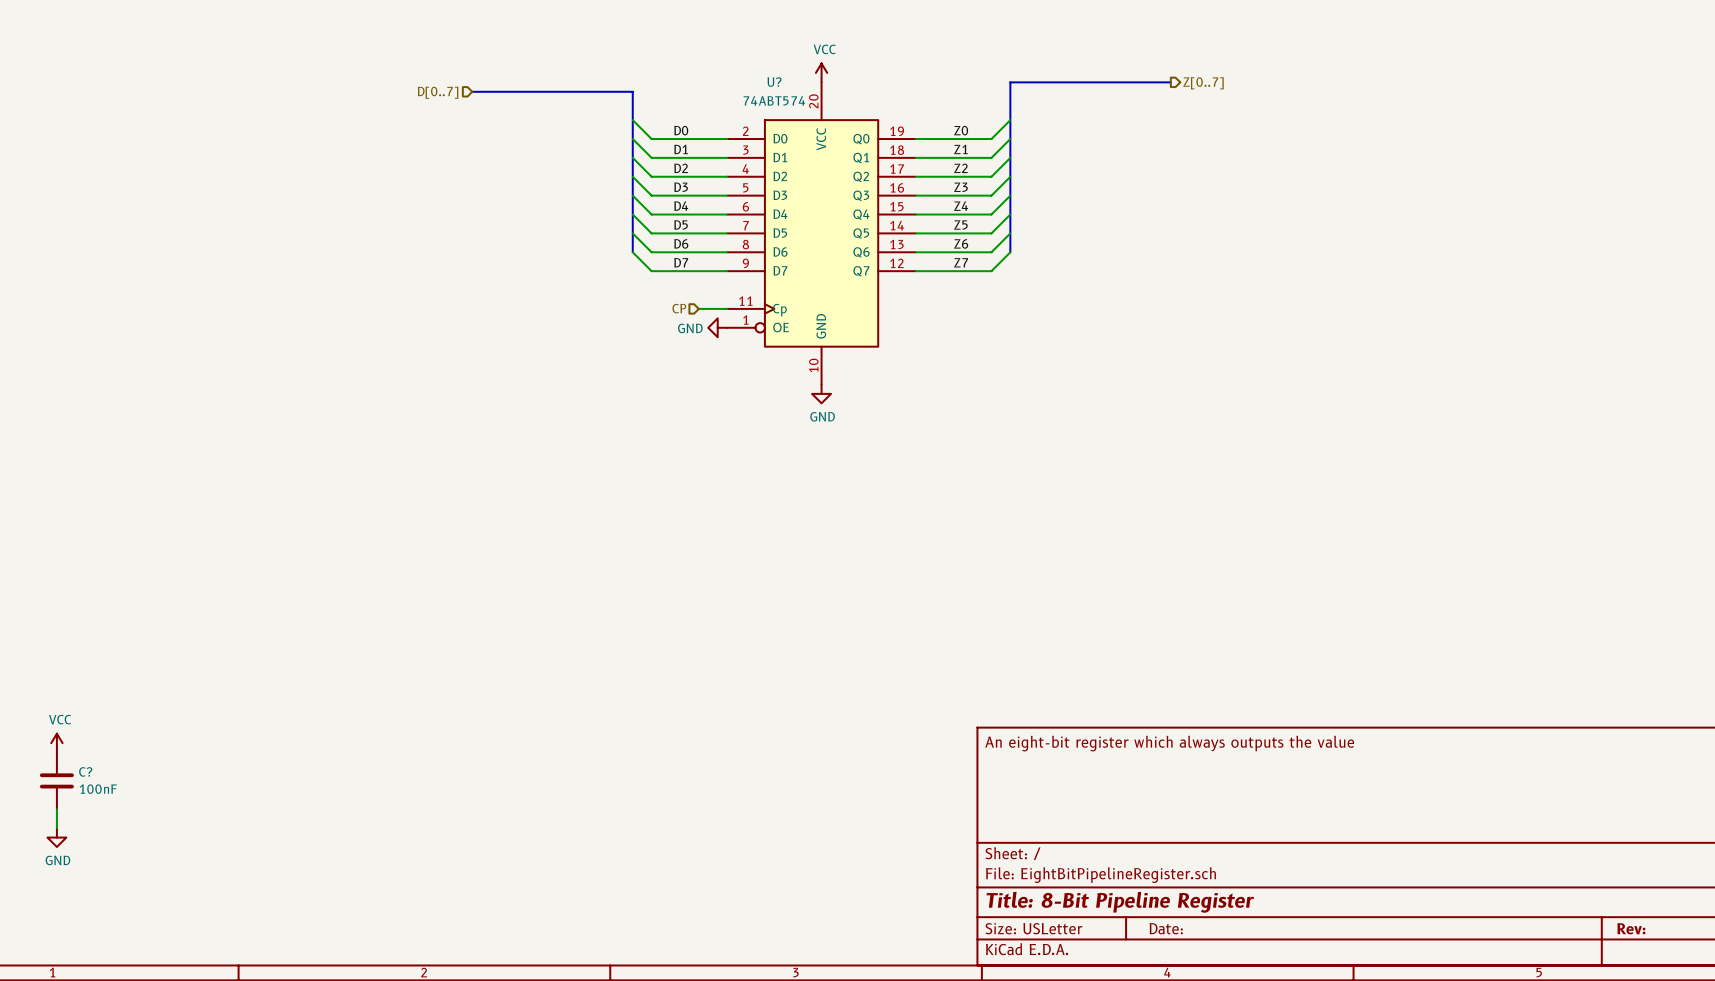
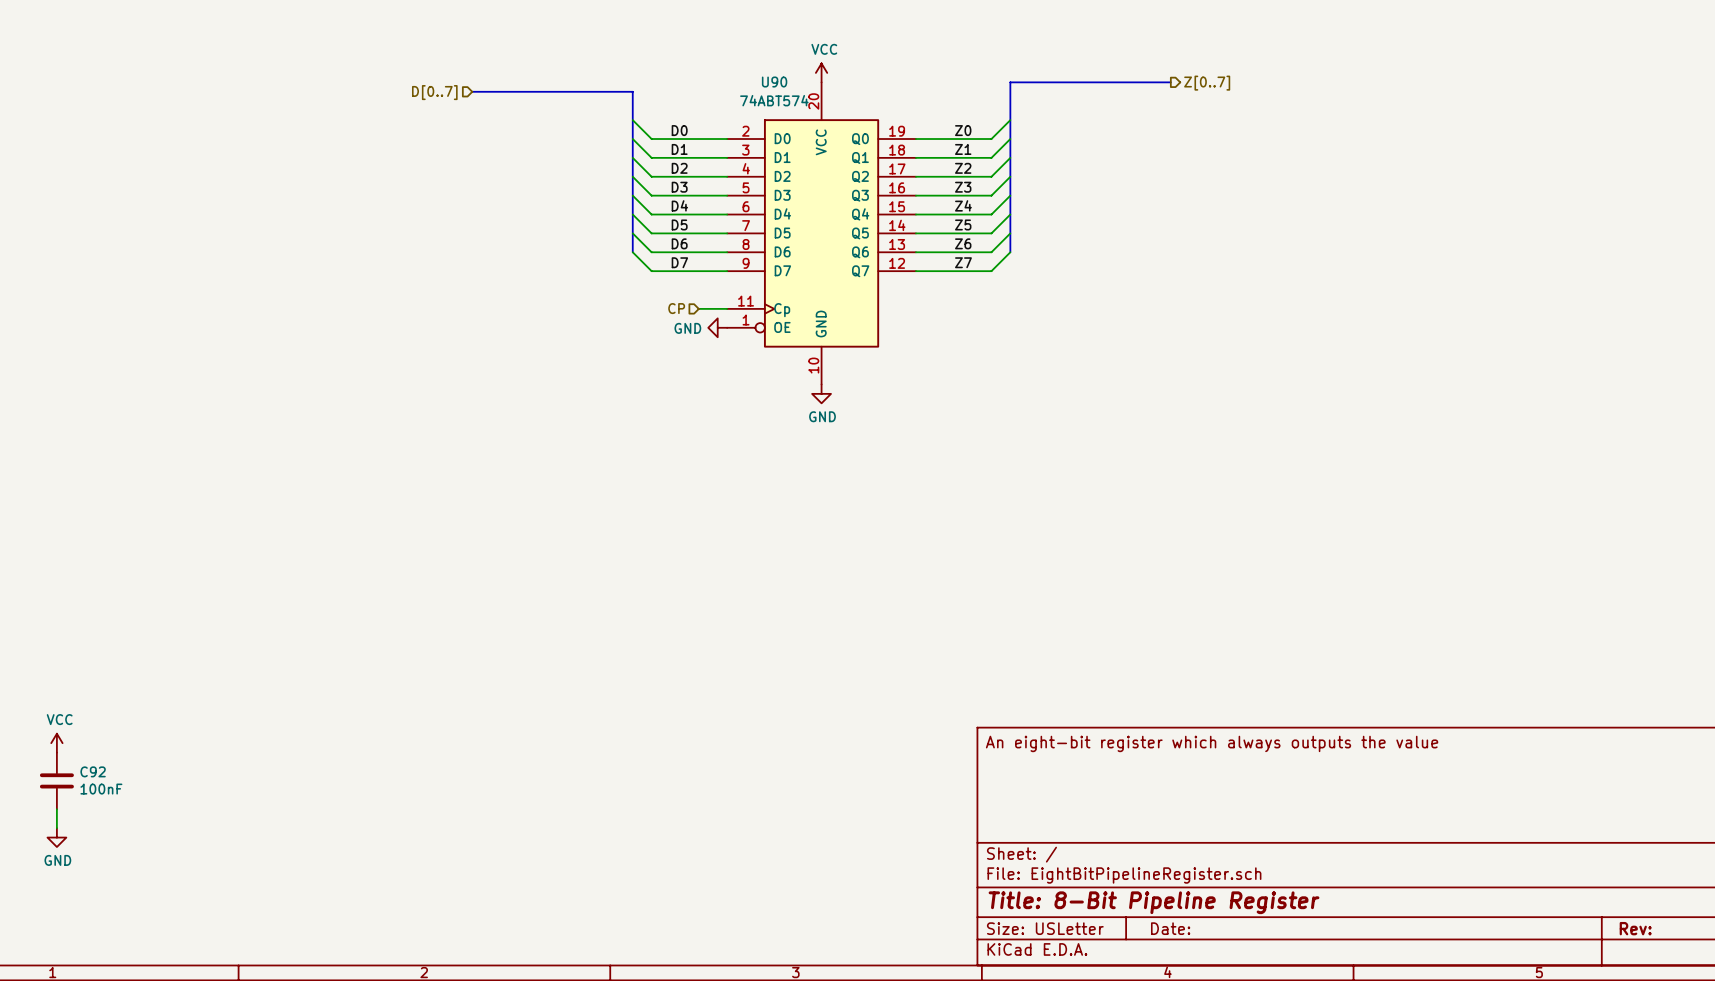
U? name: U? (774, 82) -> U90 (774, 82)
C? name: C? (85, 771) -> C92 (93, 771)

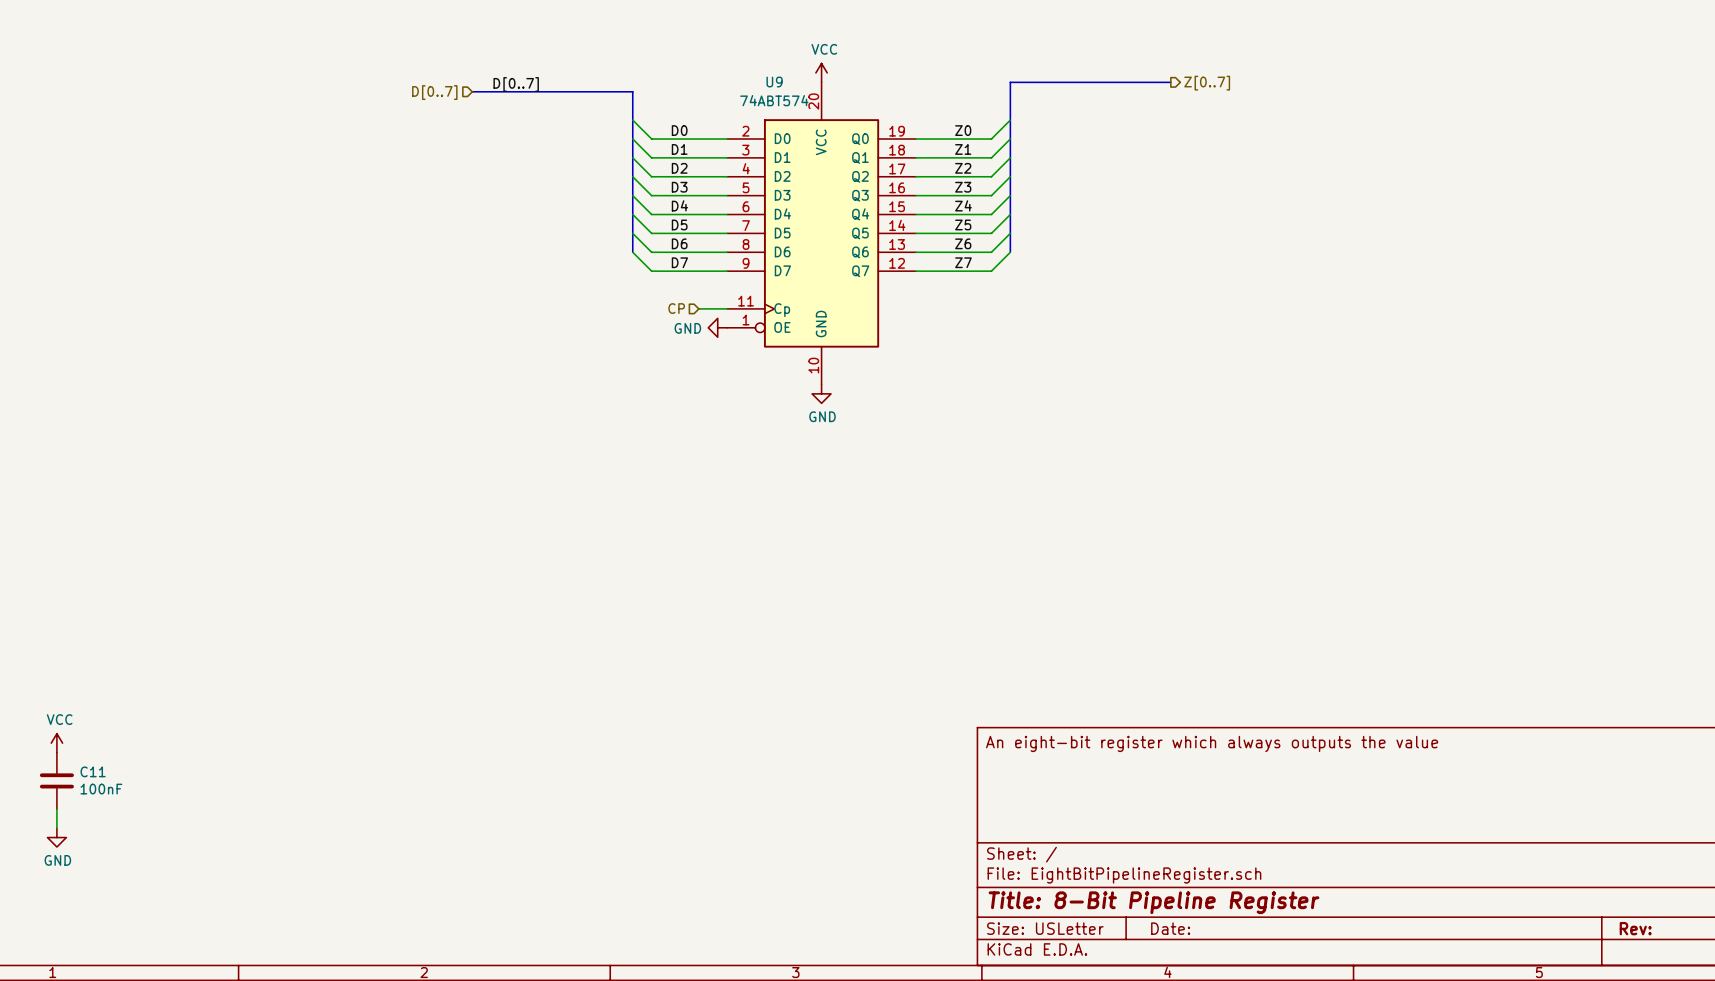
U90 name: U90 (774, 82) -> U9 (774, 82)
label: none -> D[0..7] (516, 84)
C92 name: C92 (93, 771) -> C11 (93, 771)

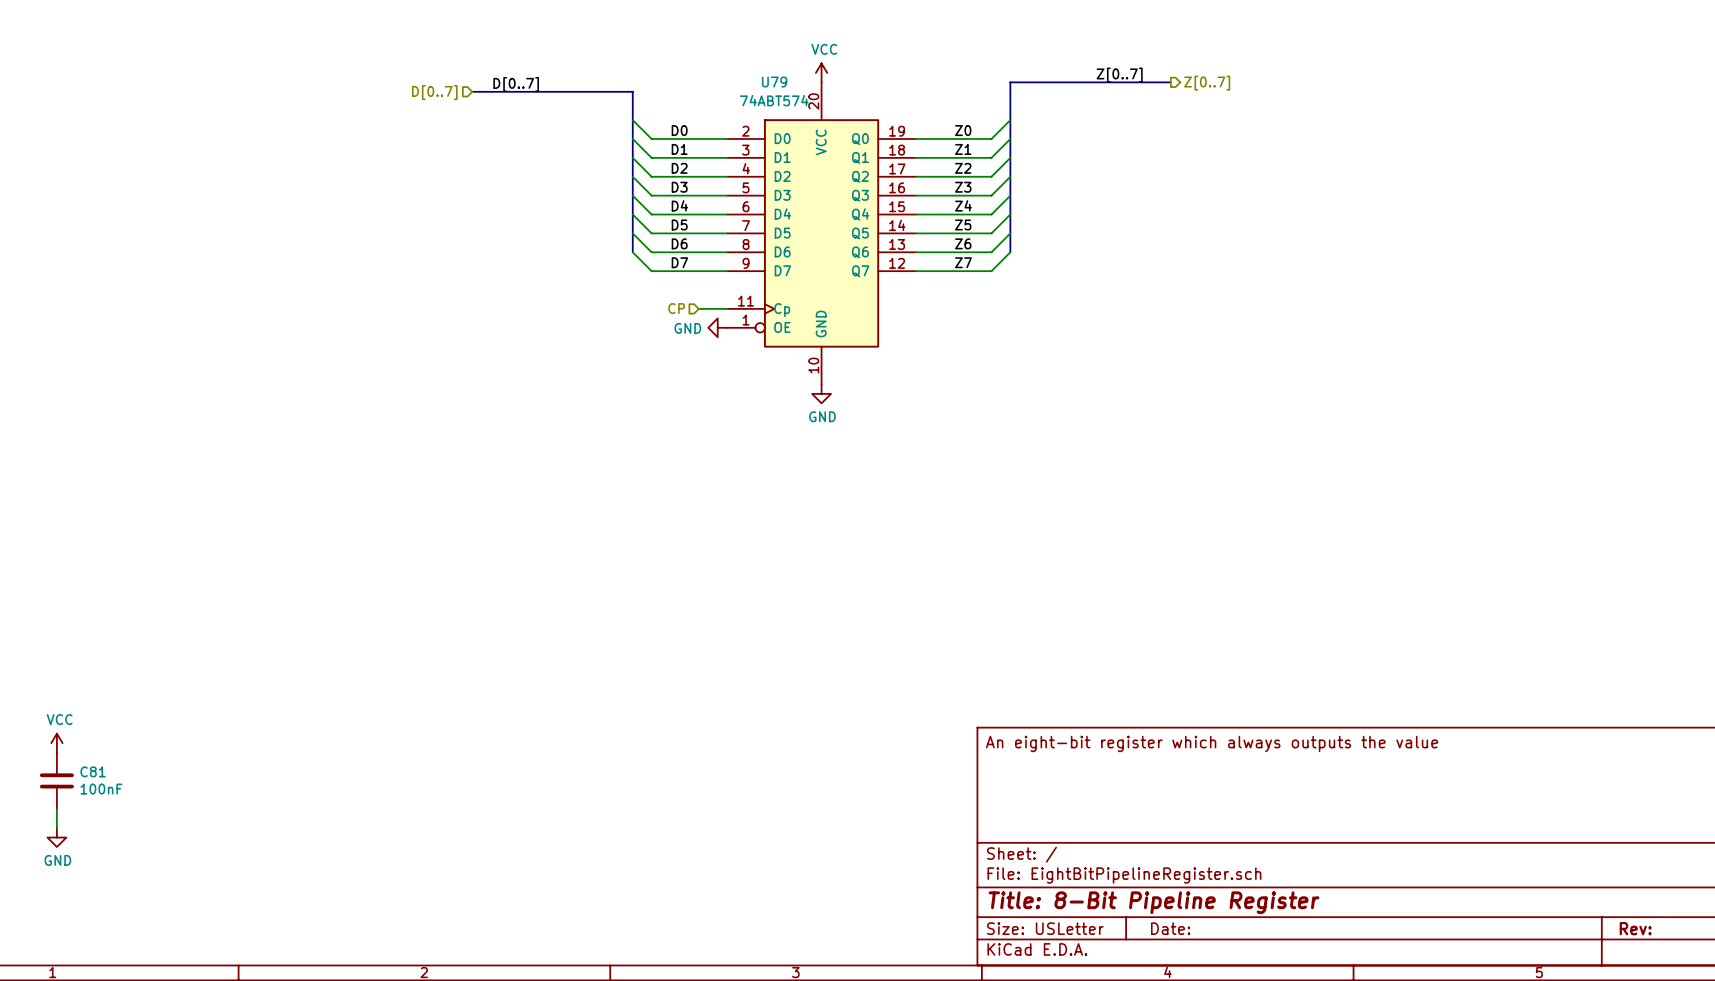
label: none -> Z[0..7] (1119, 75)
U9 name: U9 (774, 82) -> U79 (774, 82)
C11 name: C11 (93, 771) -> C81 (93, 771)

